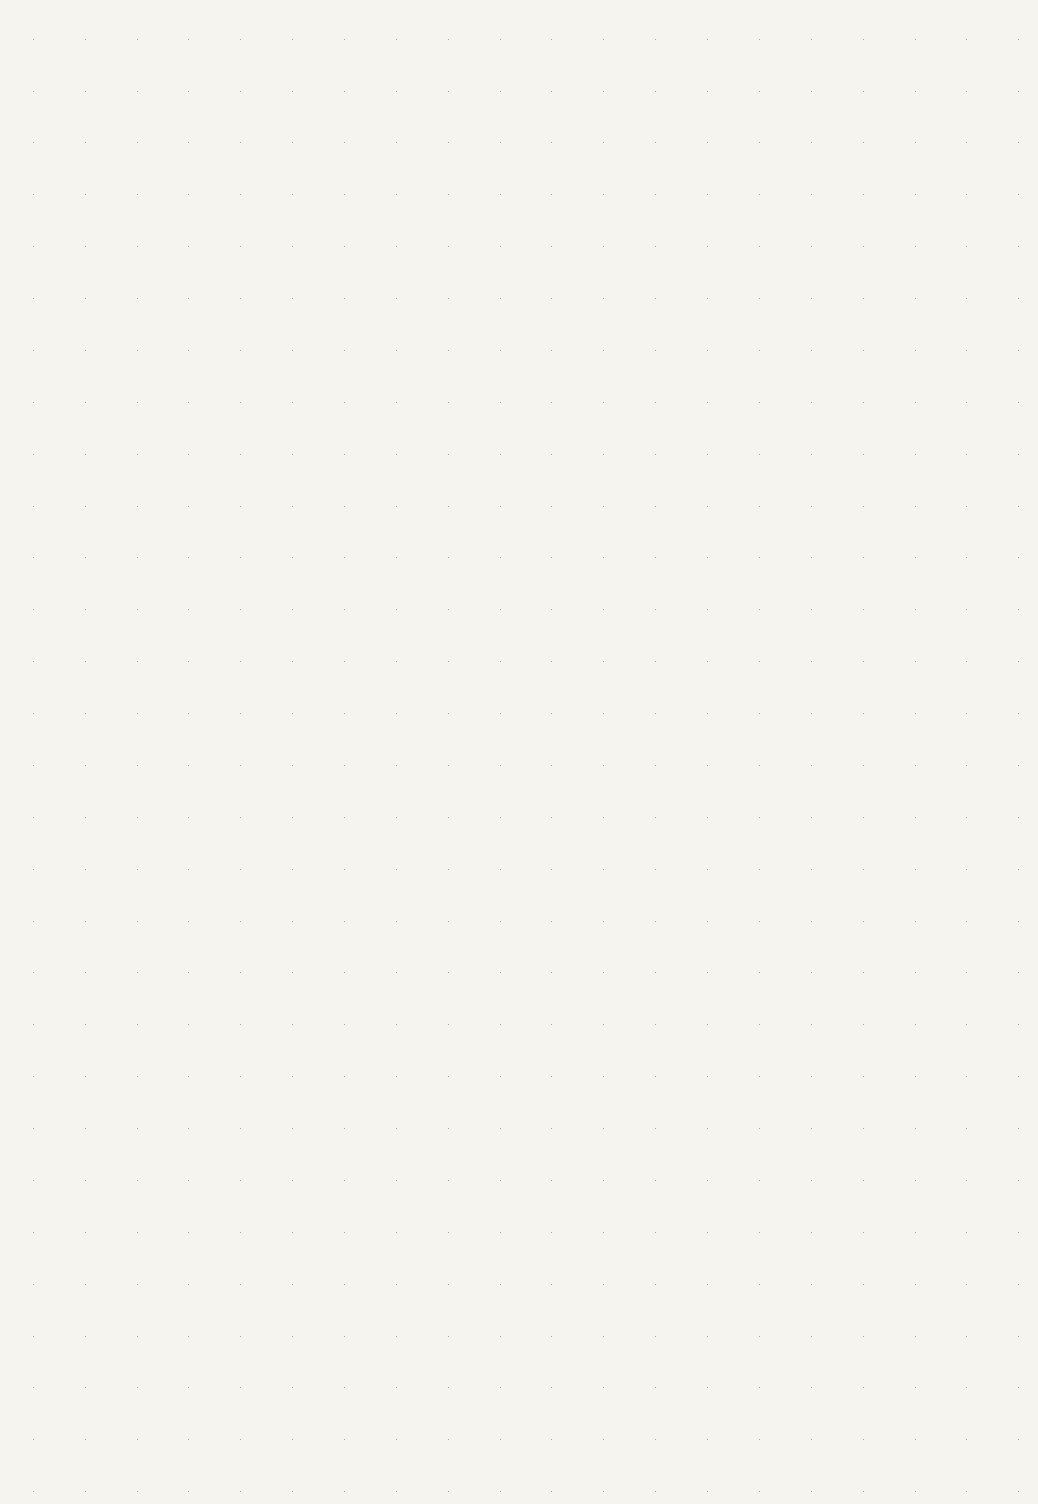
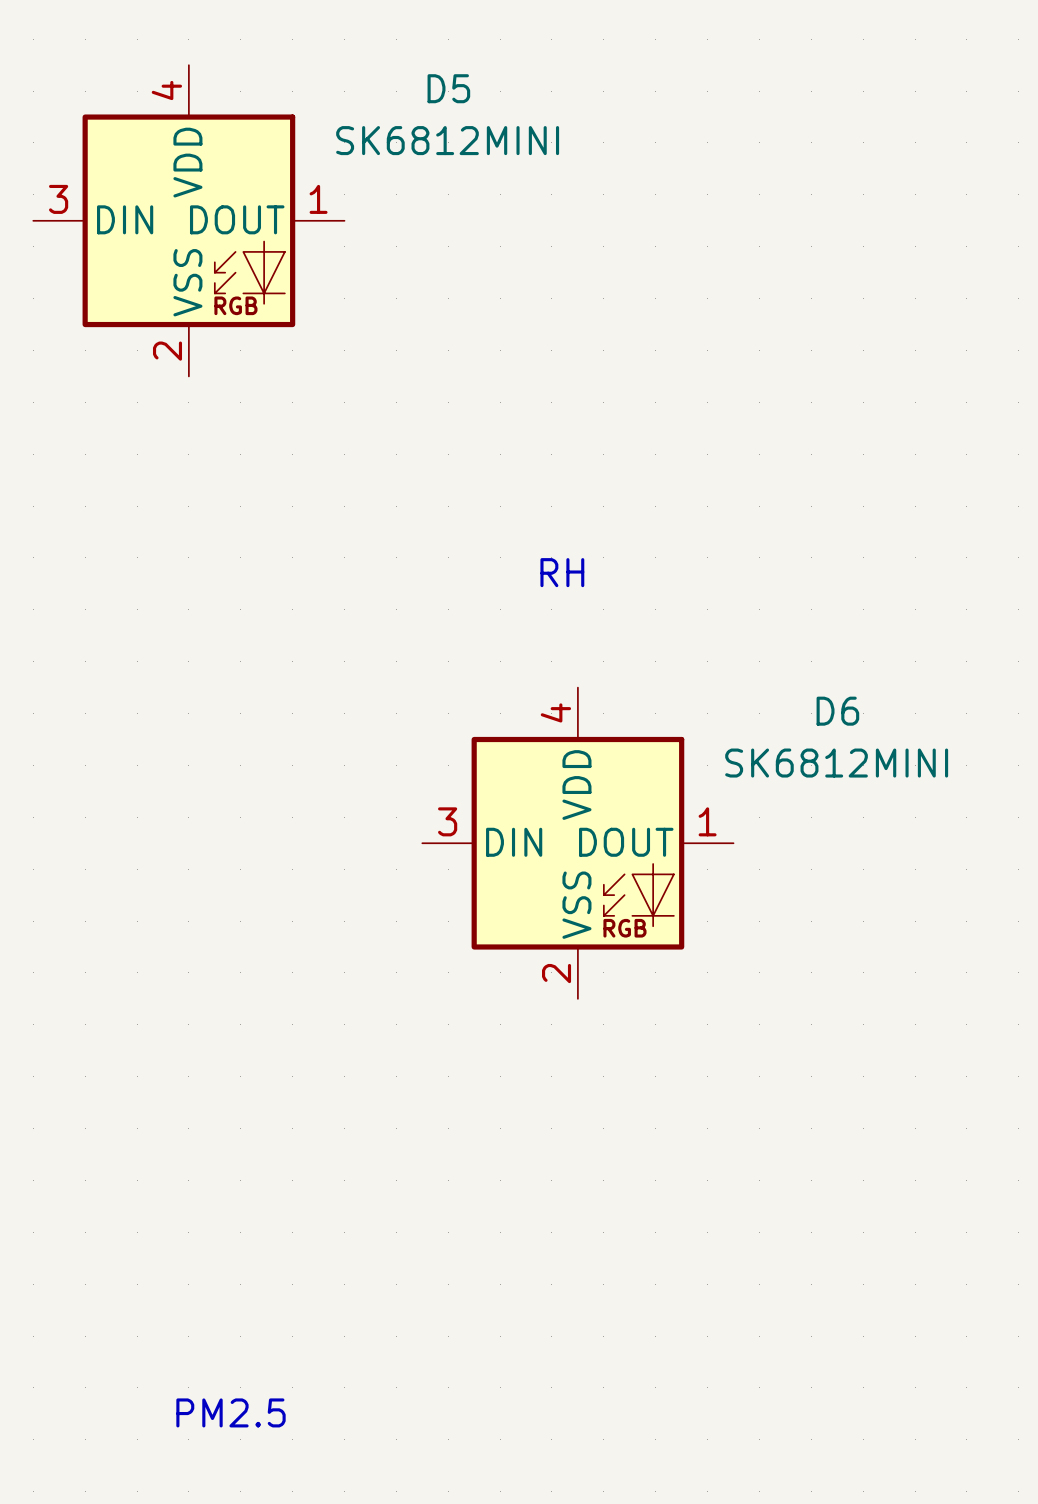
D5: none -> SK6812MINI (188, 220)
text: none -> RH (562, 572)
D6: none -> SK6812MINI (577, 843)
text: none -> PM2.5 (231, 1412)

